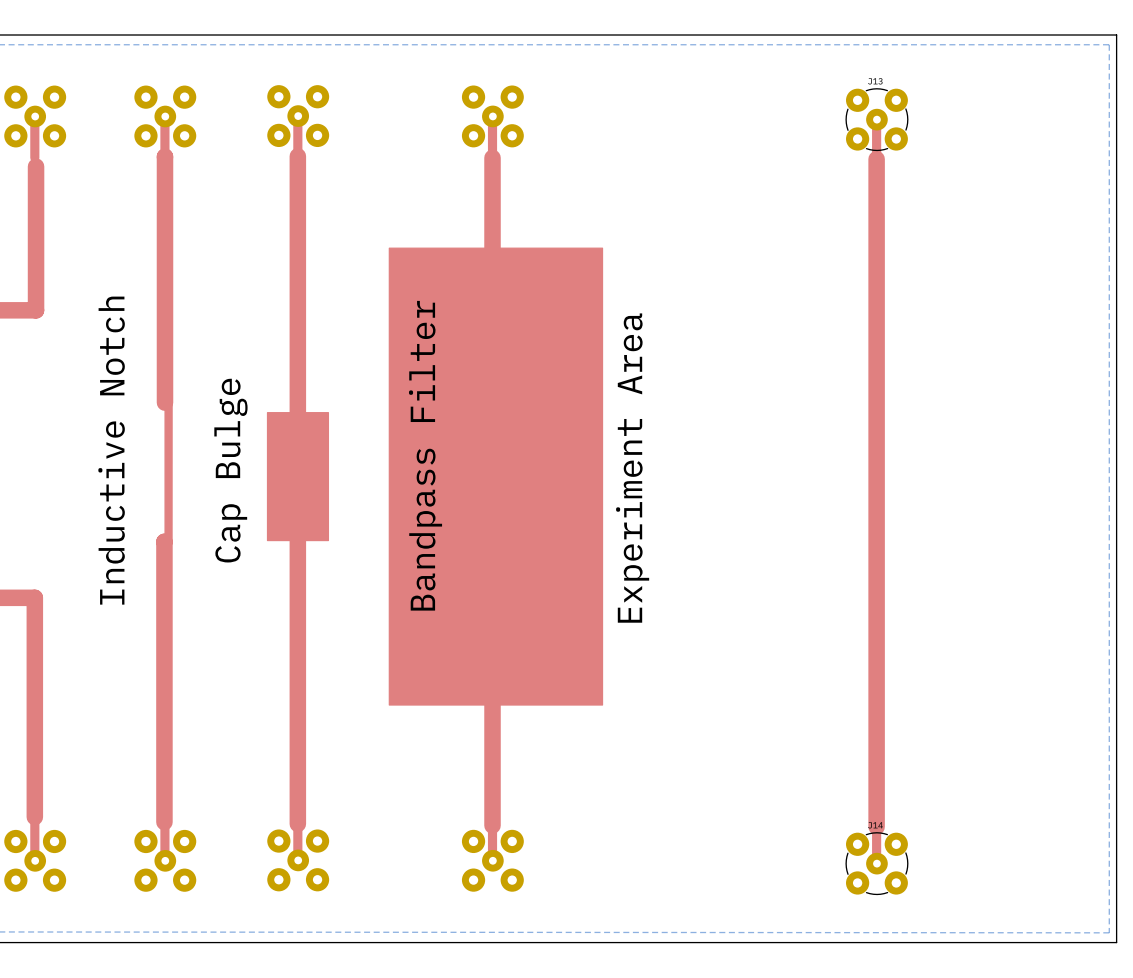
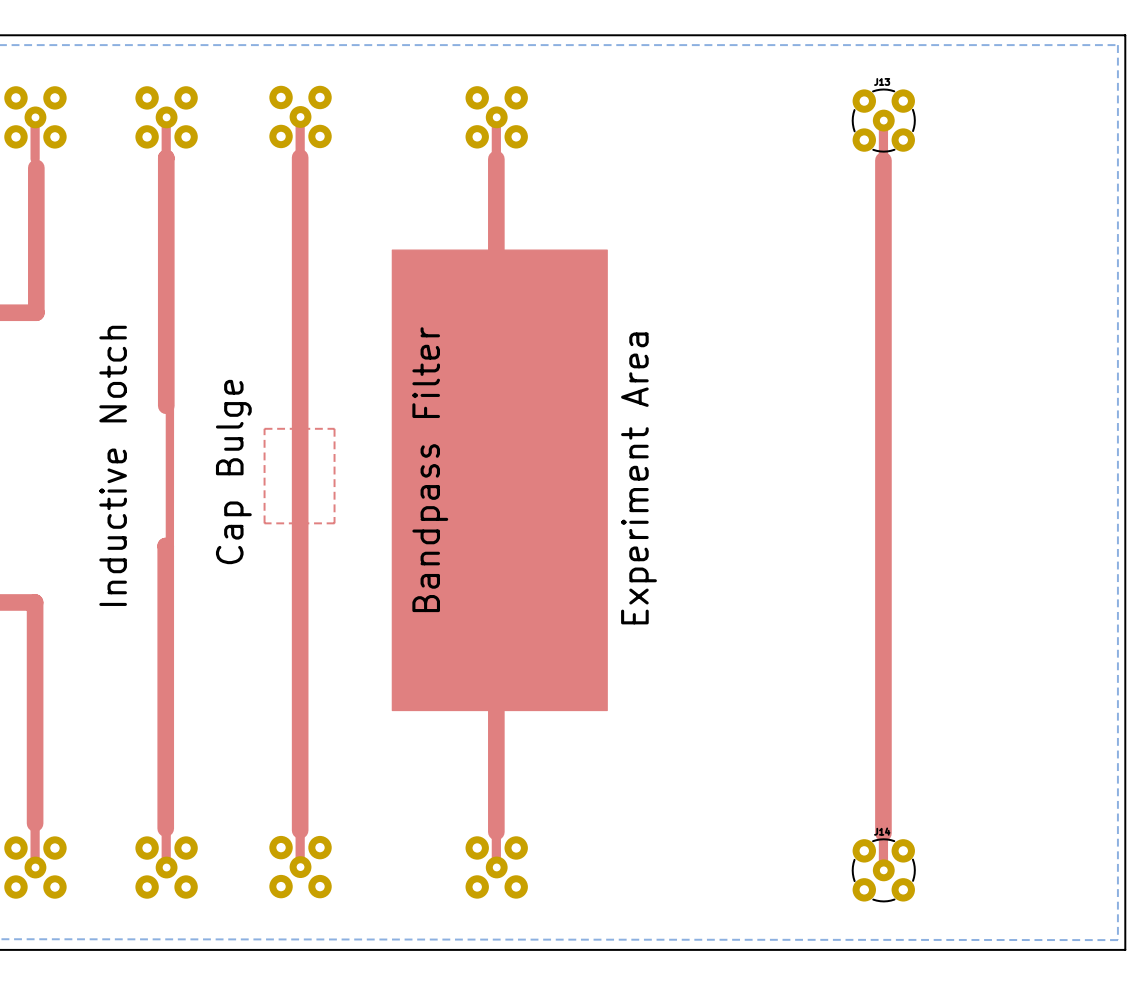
drawing: [266, 412, 330, 542] -> none
top zone outline: none -> (264, 428) (334, 428) (334, 523) (264, 523) (264, 428)

